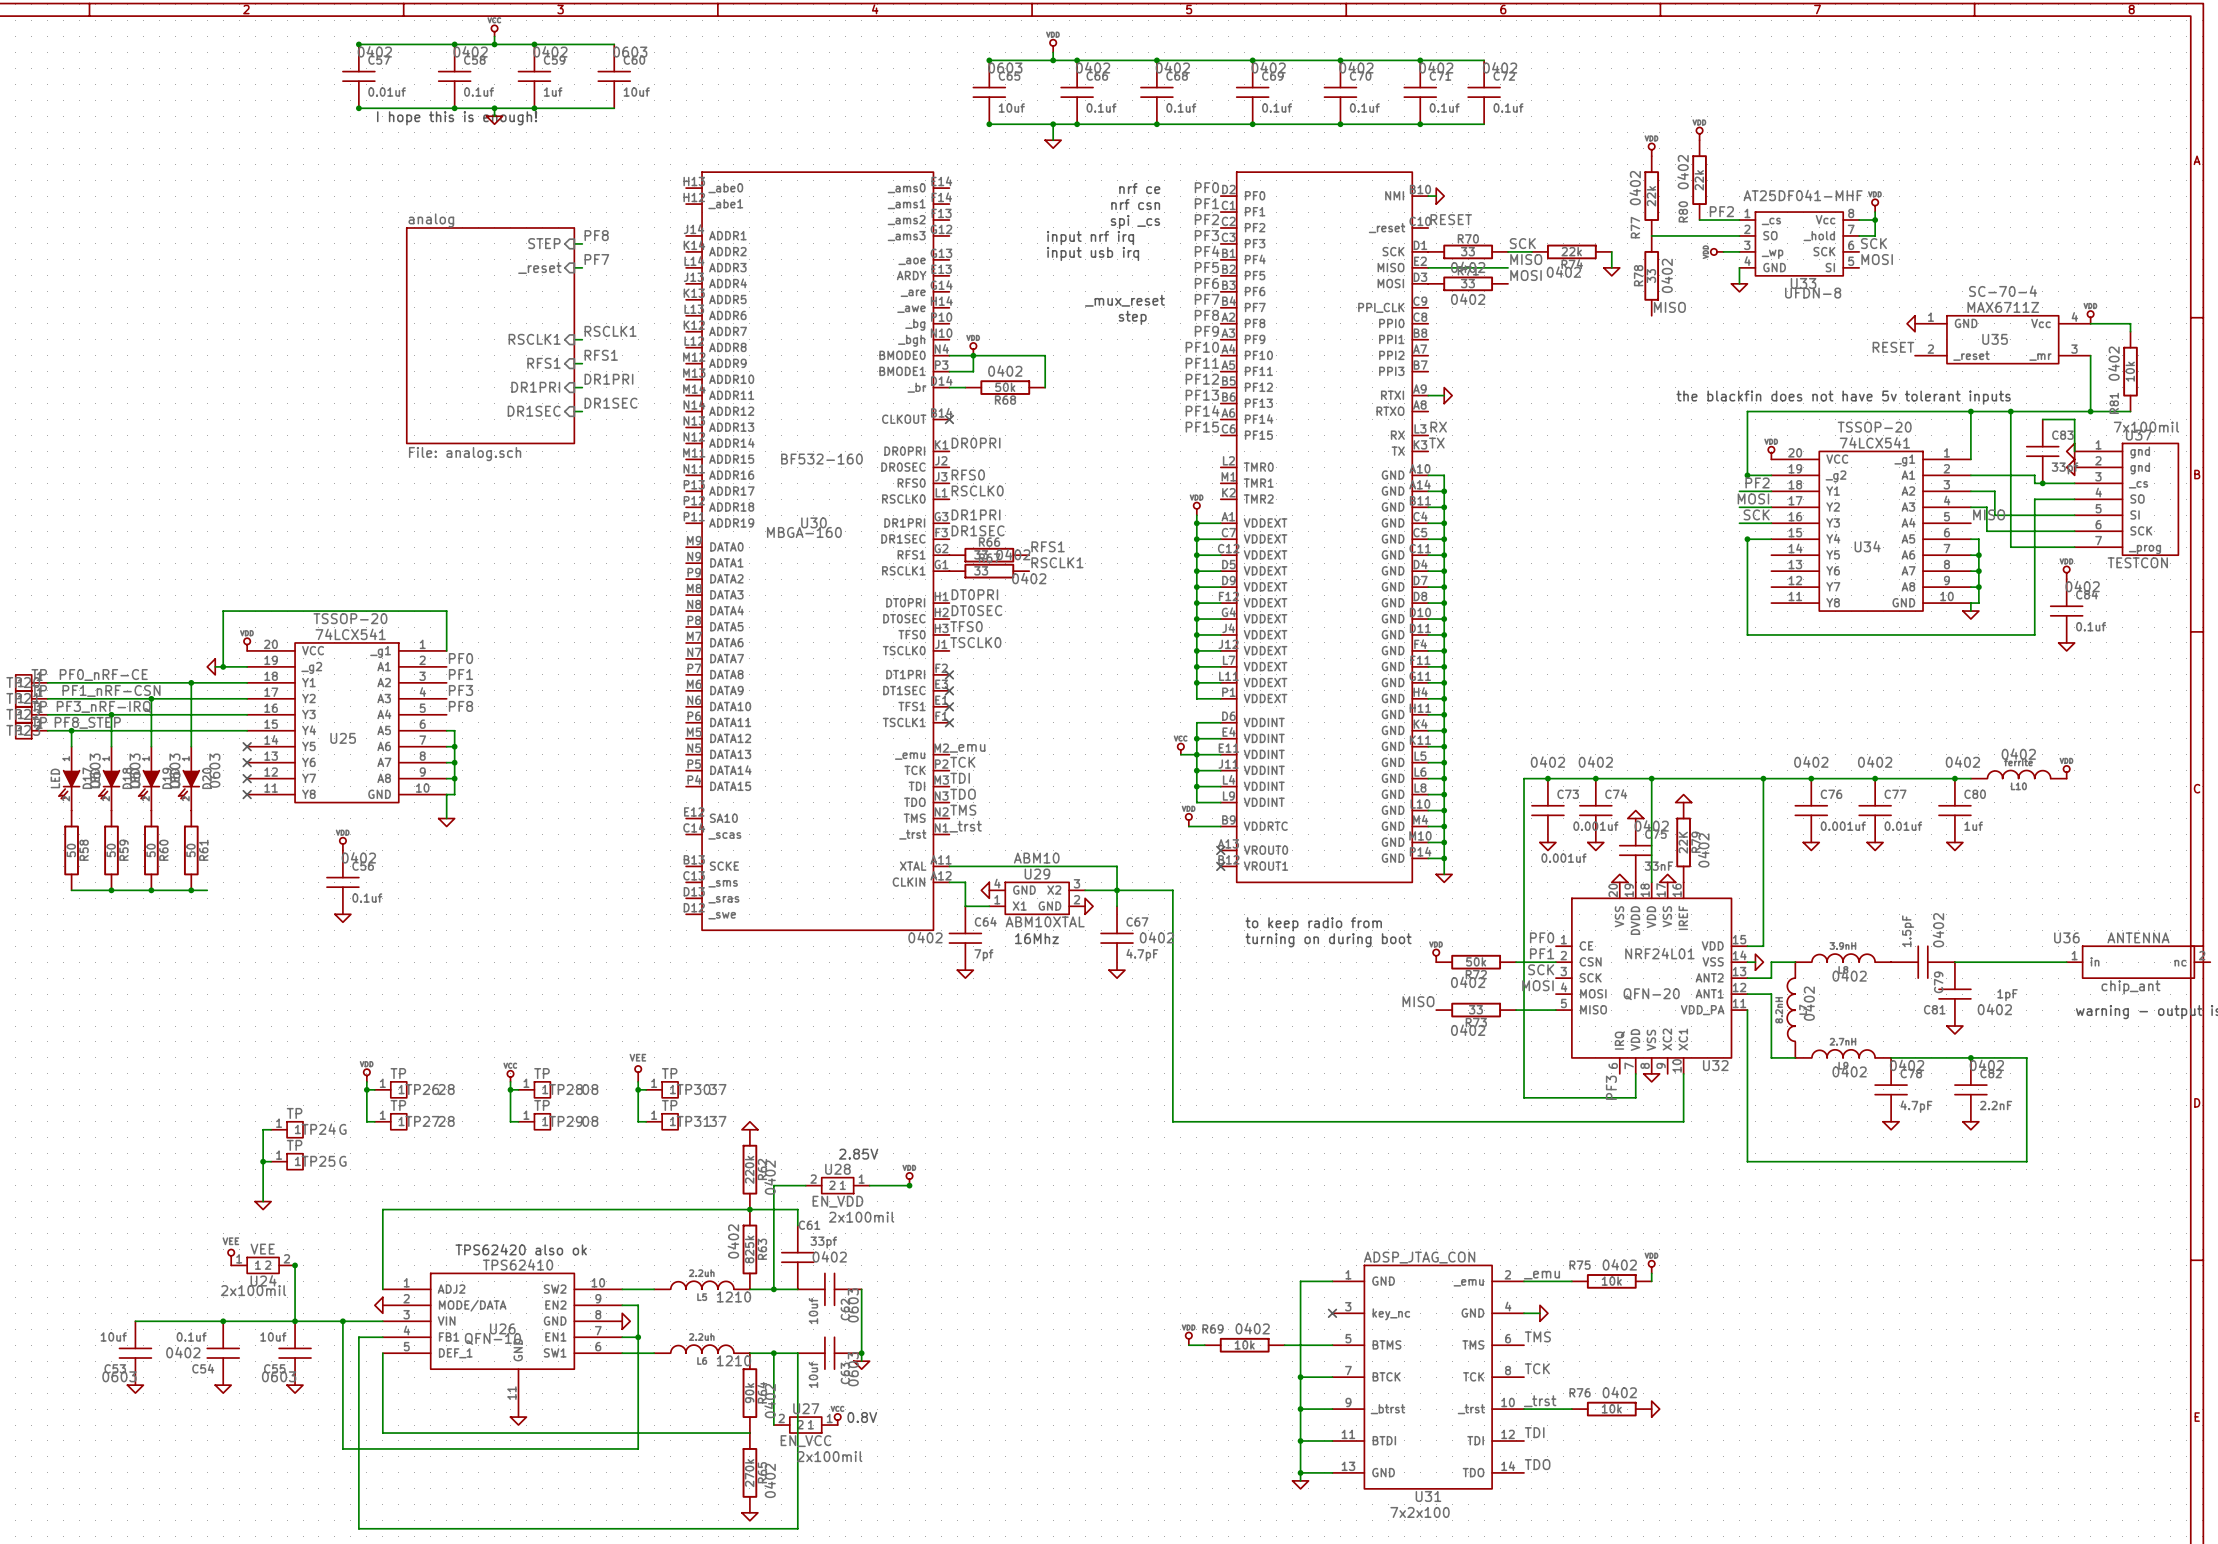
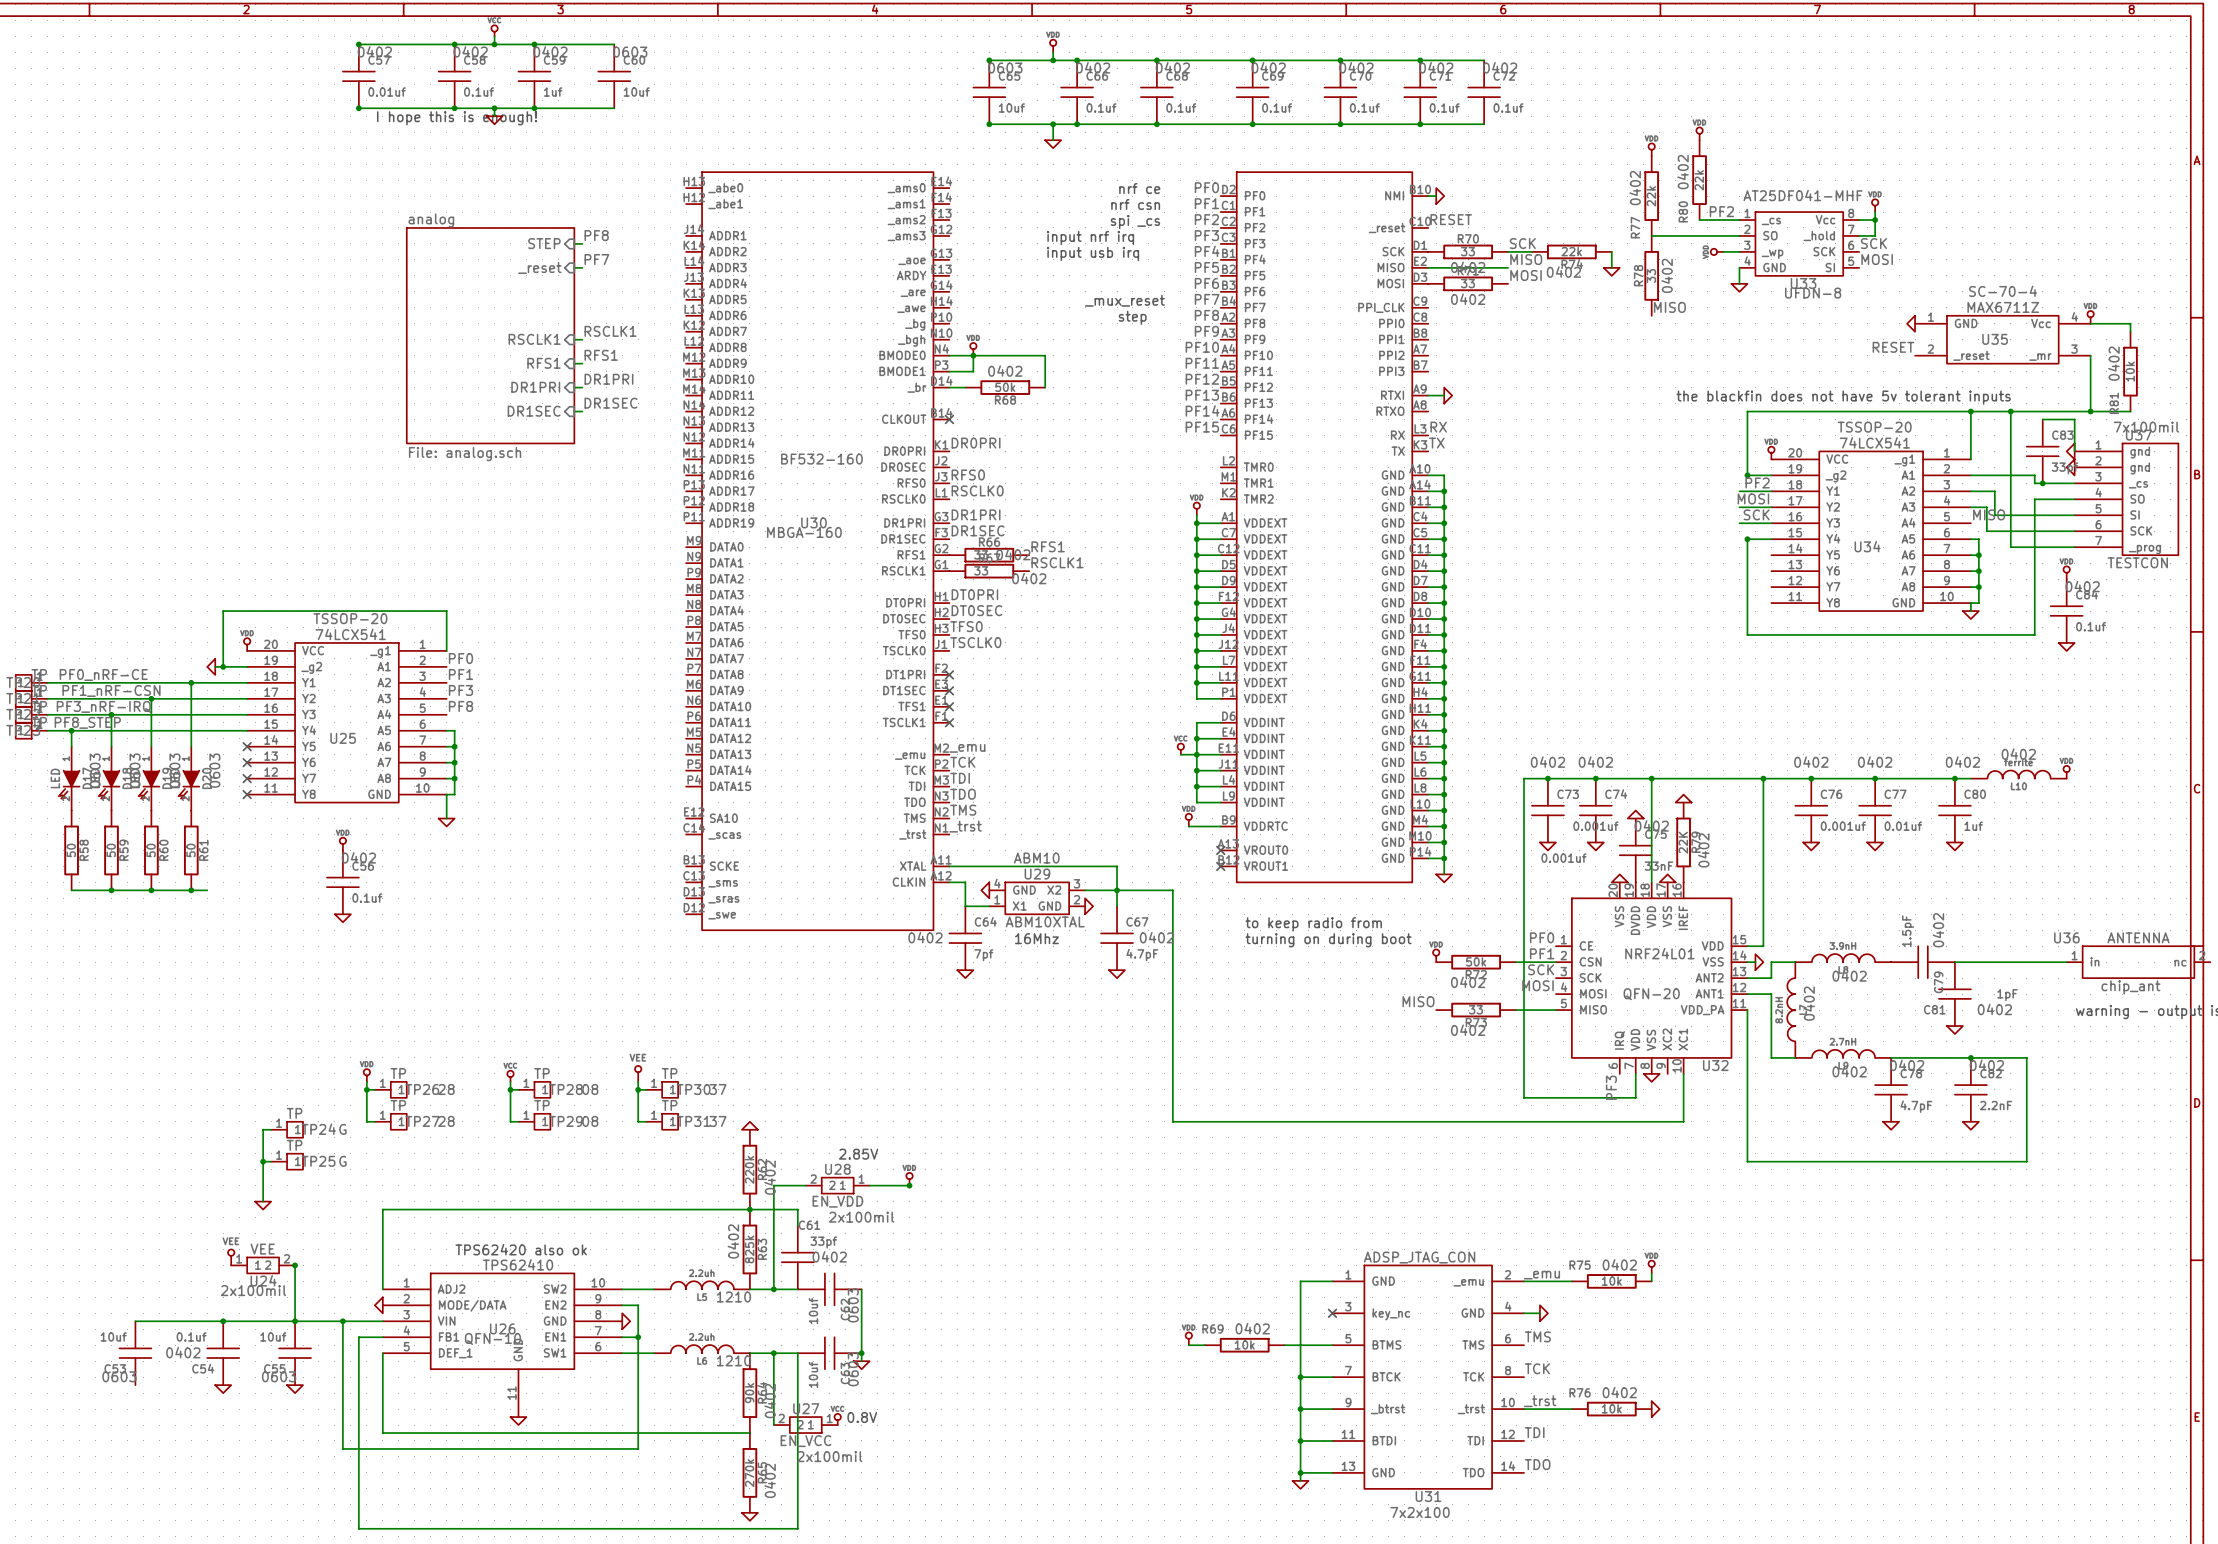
power symbol: (135, 1389) -> none

